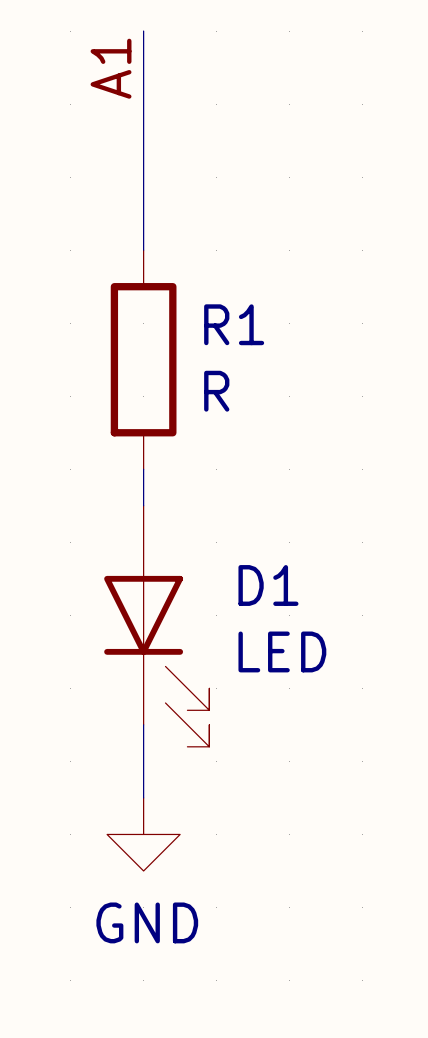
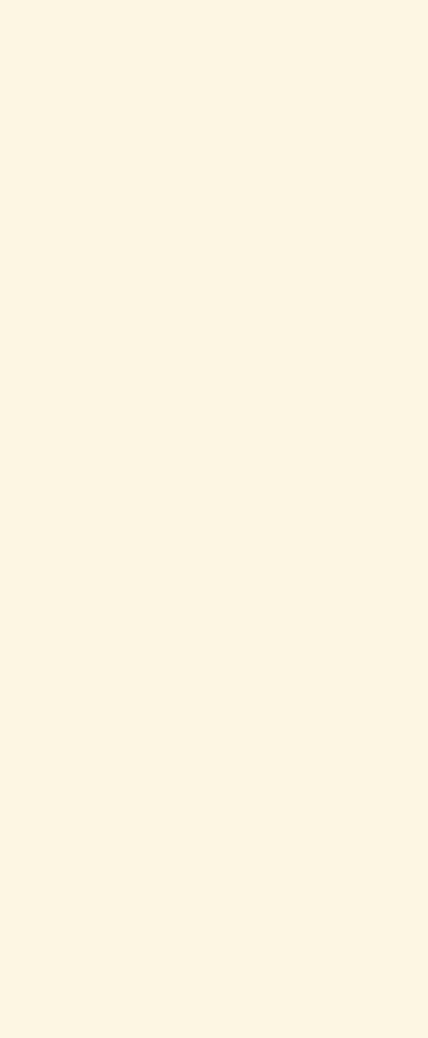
wire: (143, 31) (143, 250) -> none
label: A1 (111, 68) -> none
R1: R (143, 359) -> none
wire: (143, 469) (143, 505) -> none
D1: LED (156, 626) -> none
wire: (143, 724) (143, 797) -> none
power symbol: GND (143, 834) -> none

